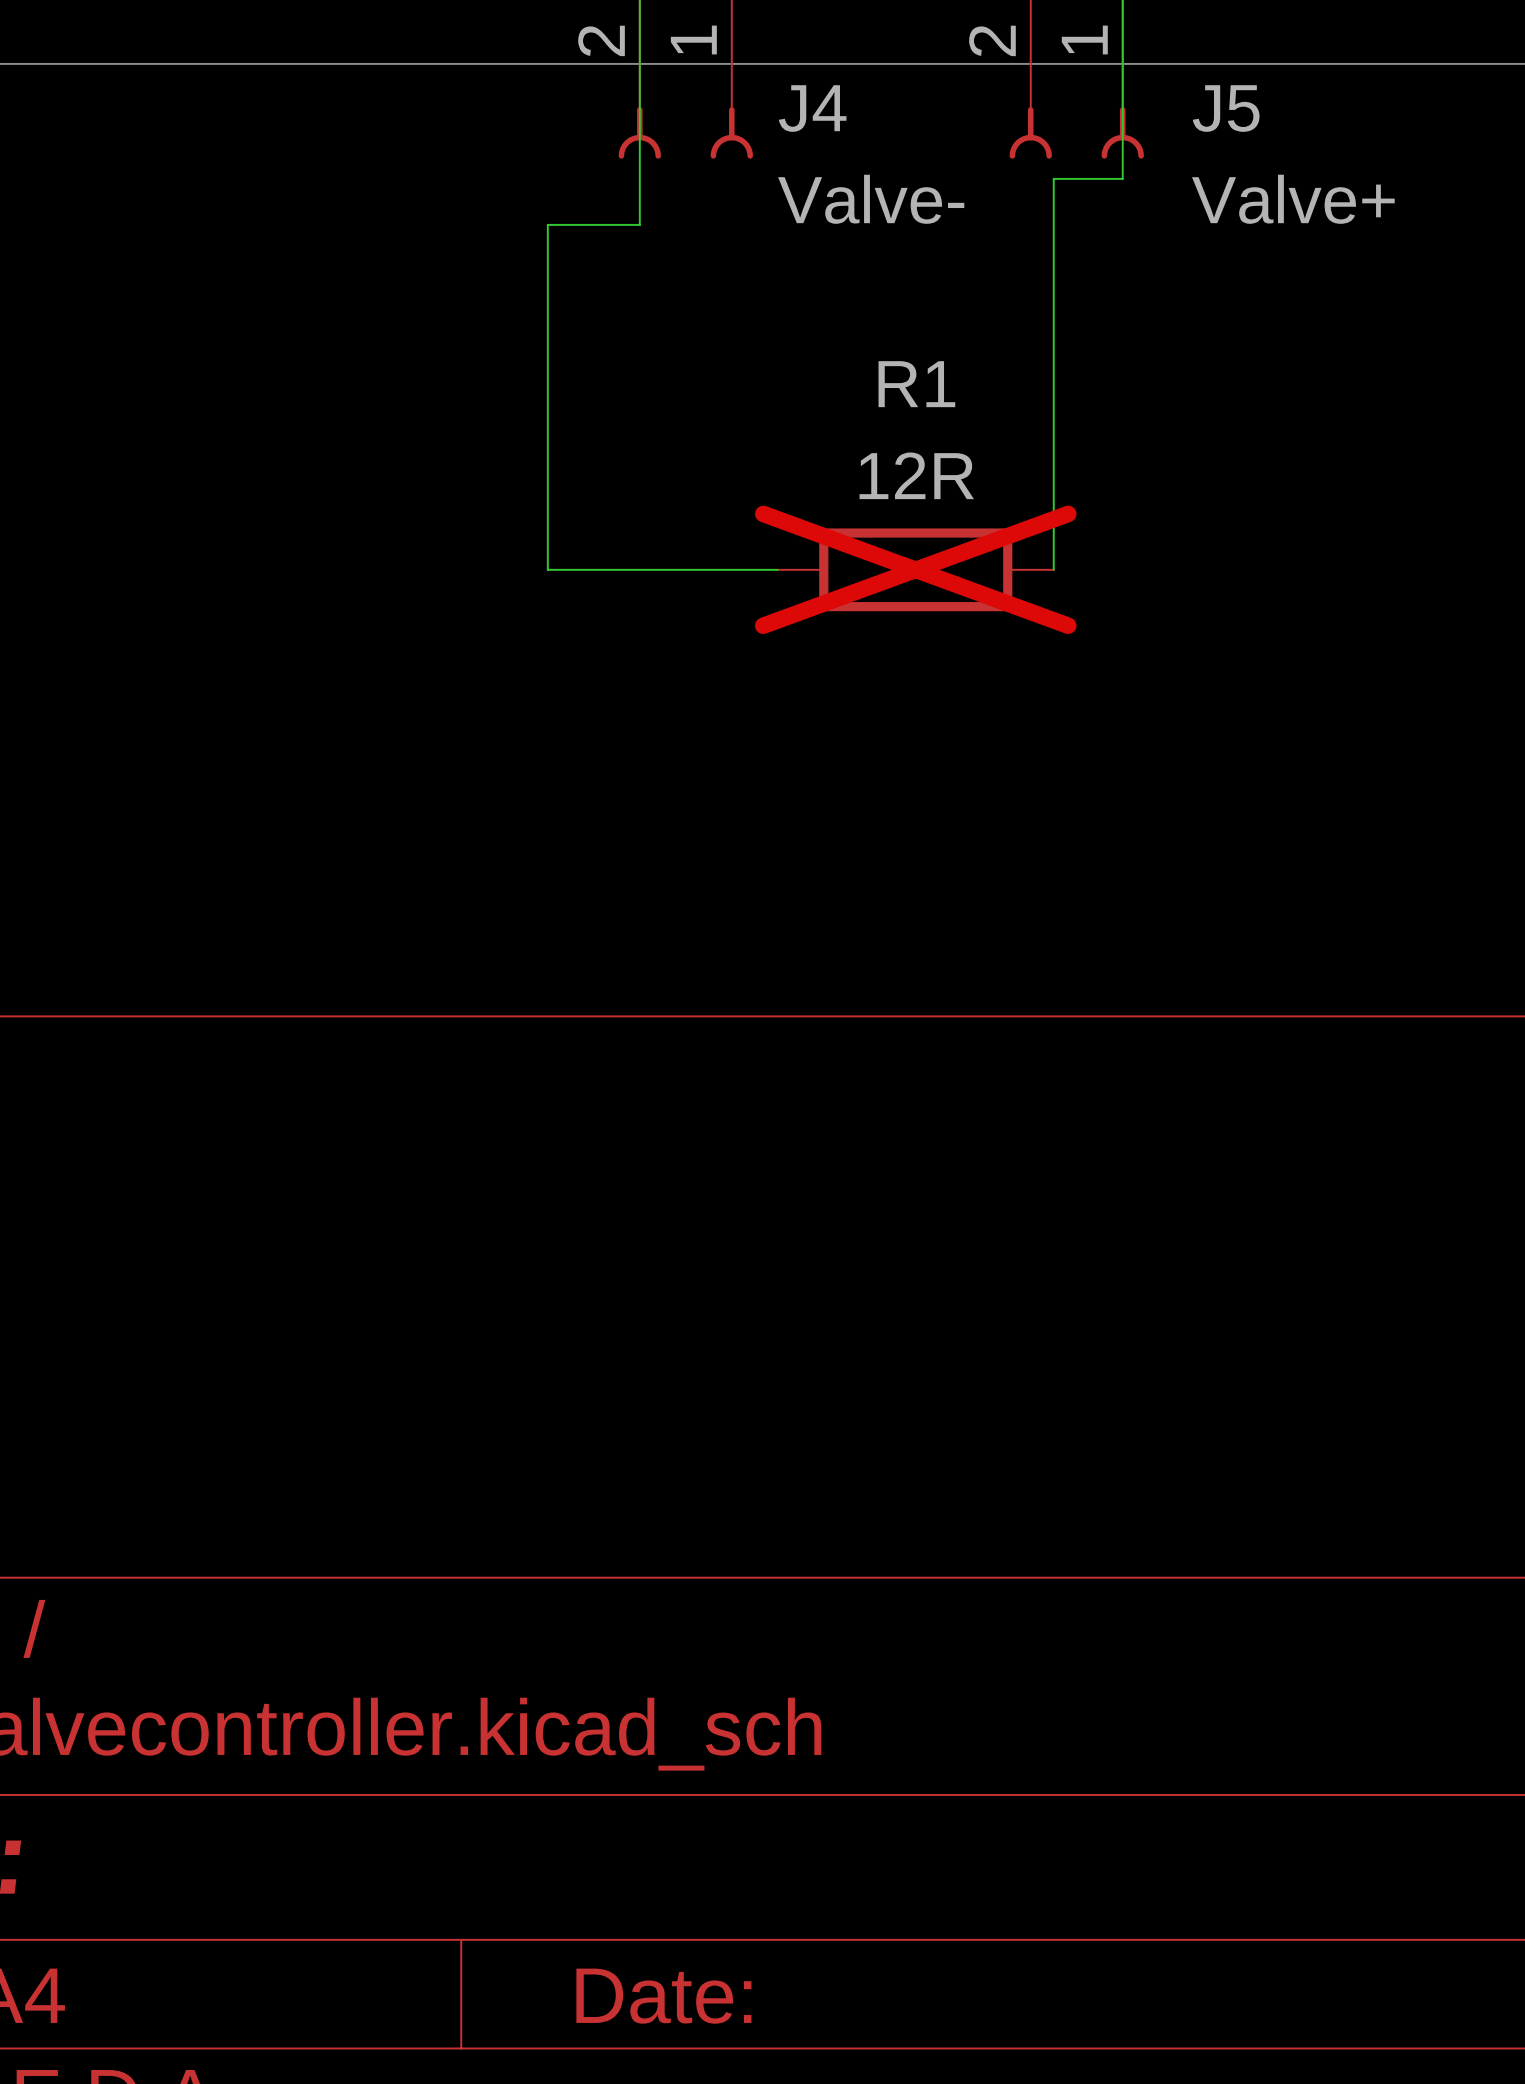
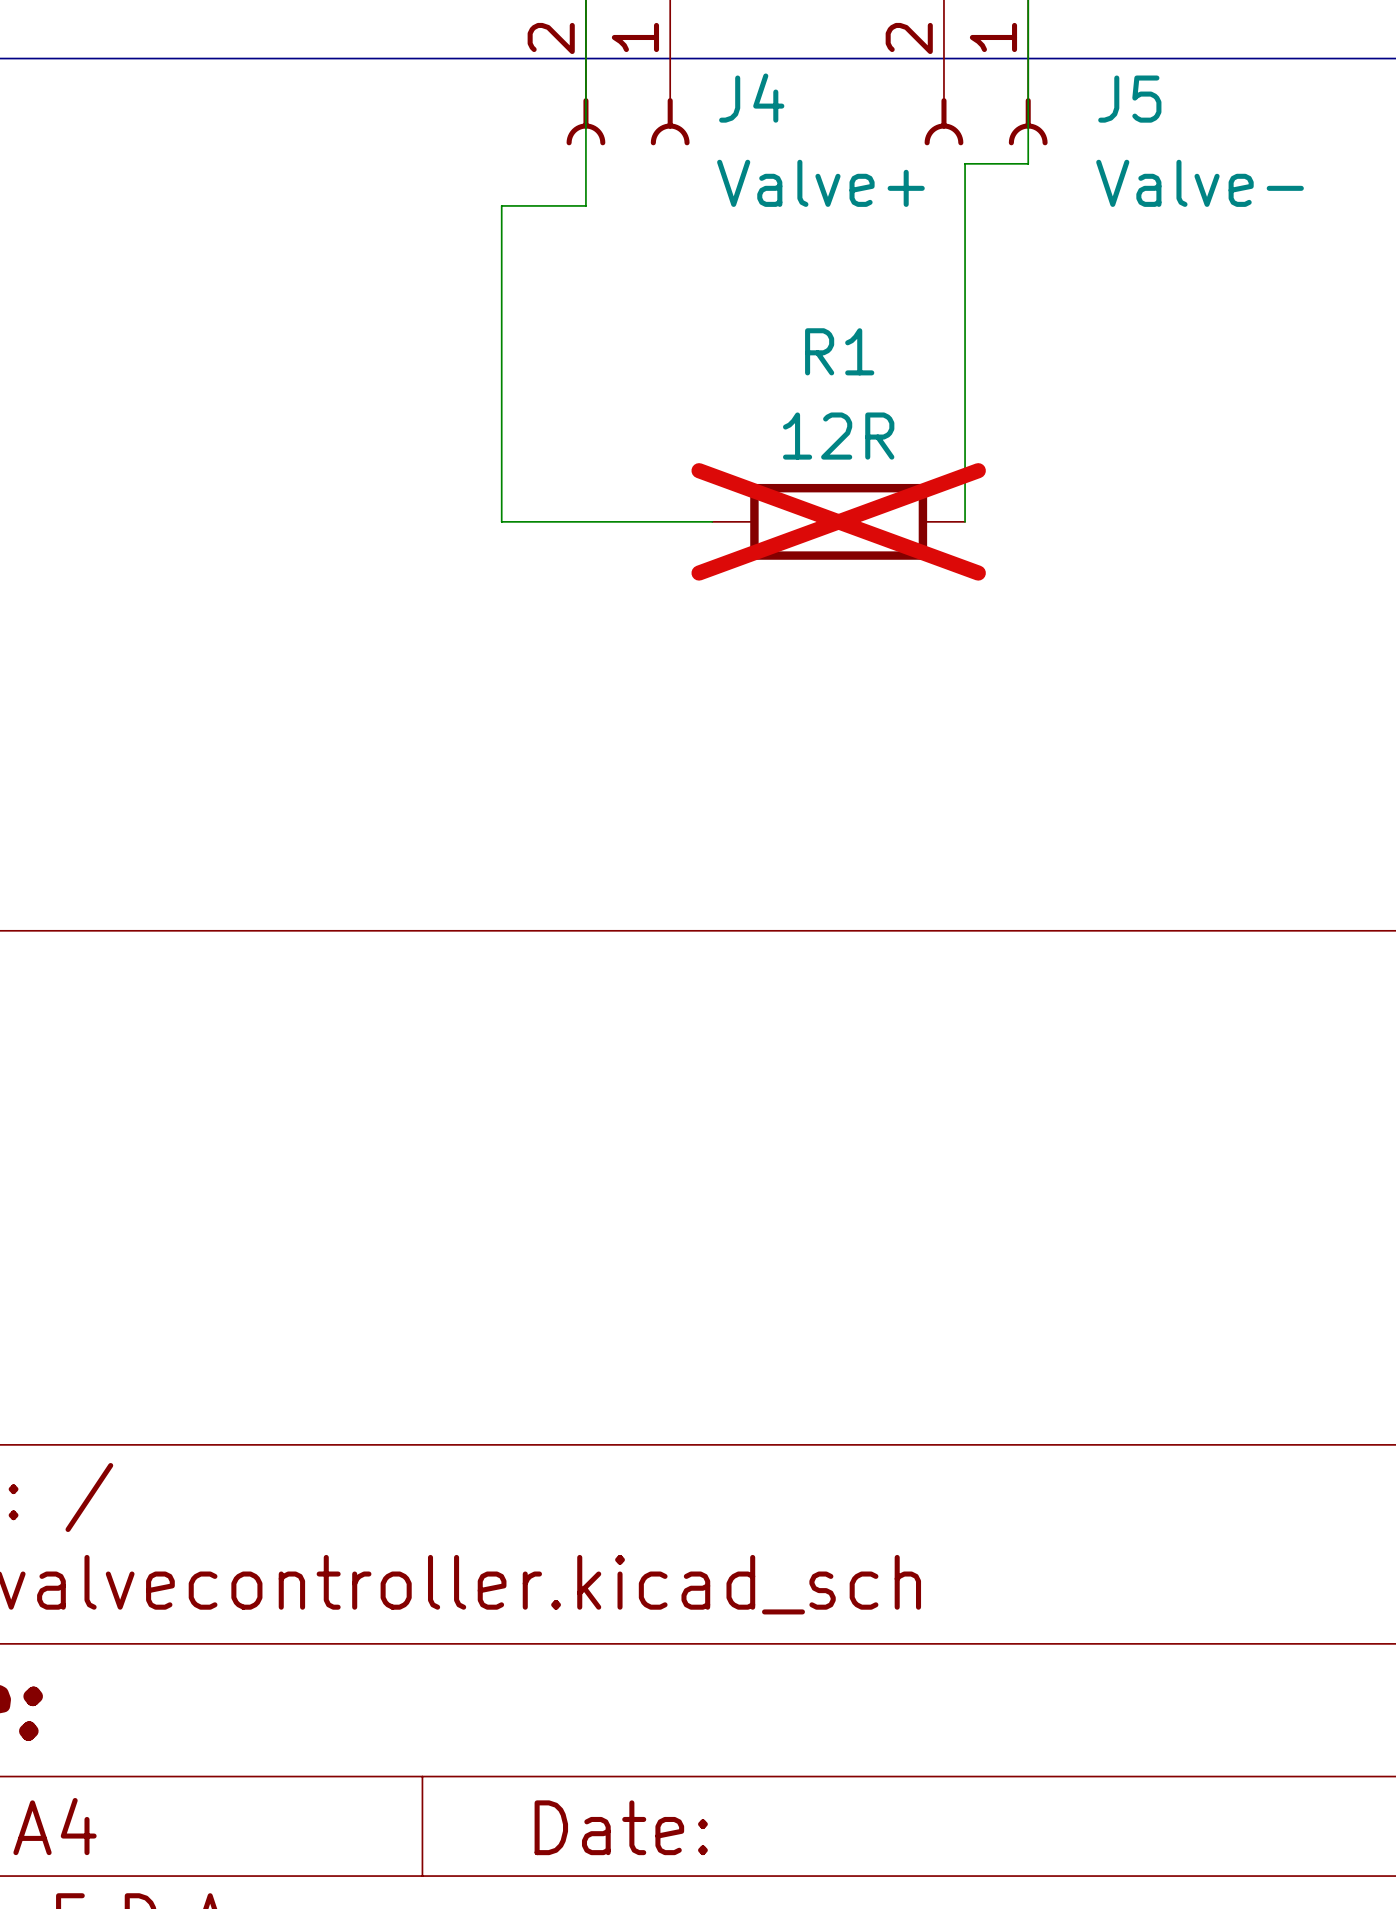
J4 value: Valve- (871, 199) -> Valve+ (820, 183)
J5 value: Valve+ (1293, 199) -> Valve- (1200, 183)

